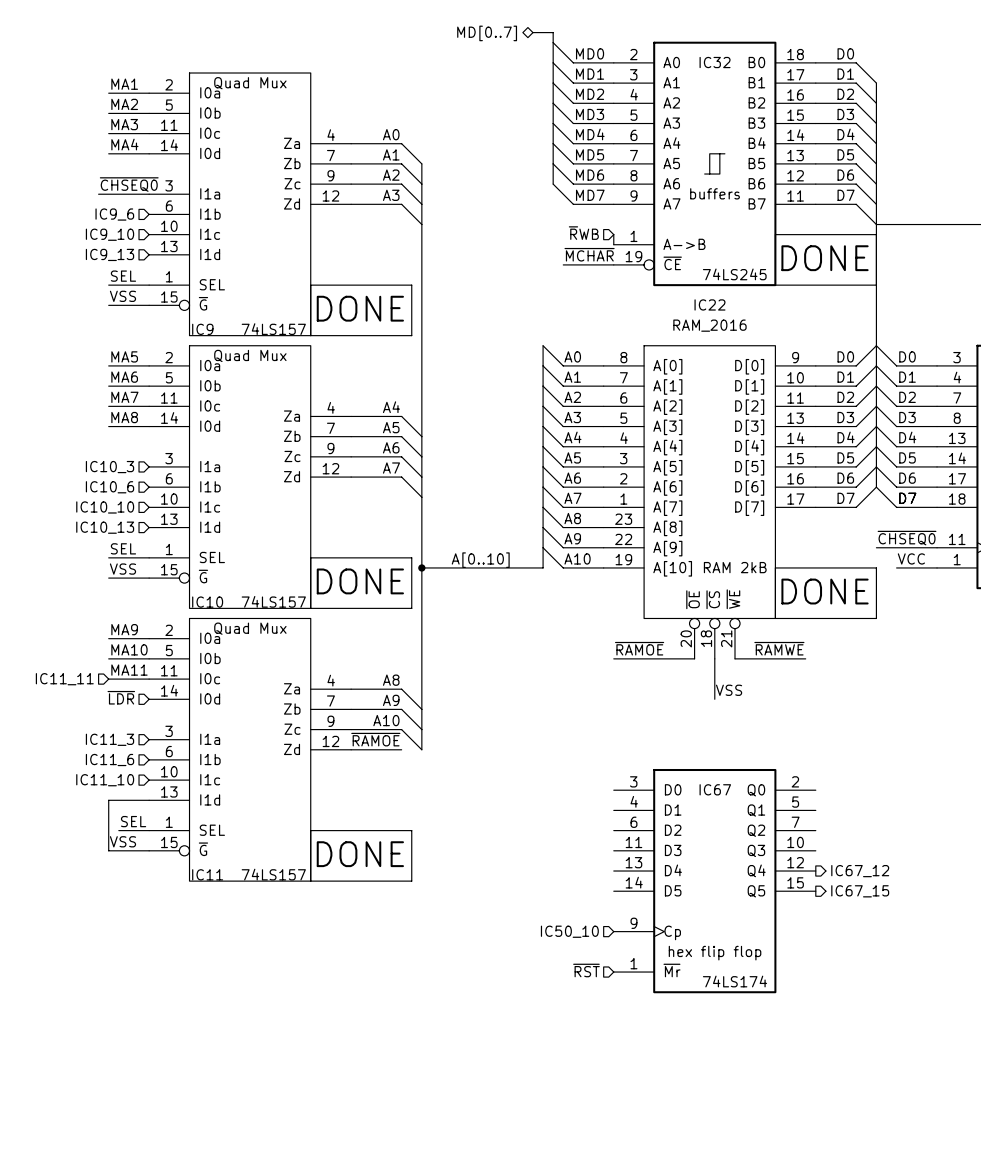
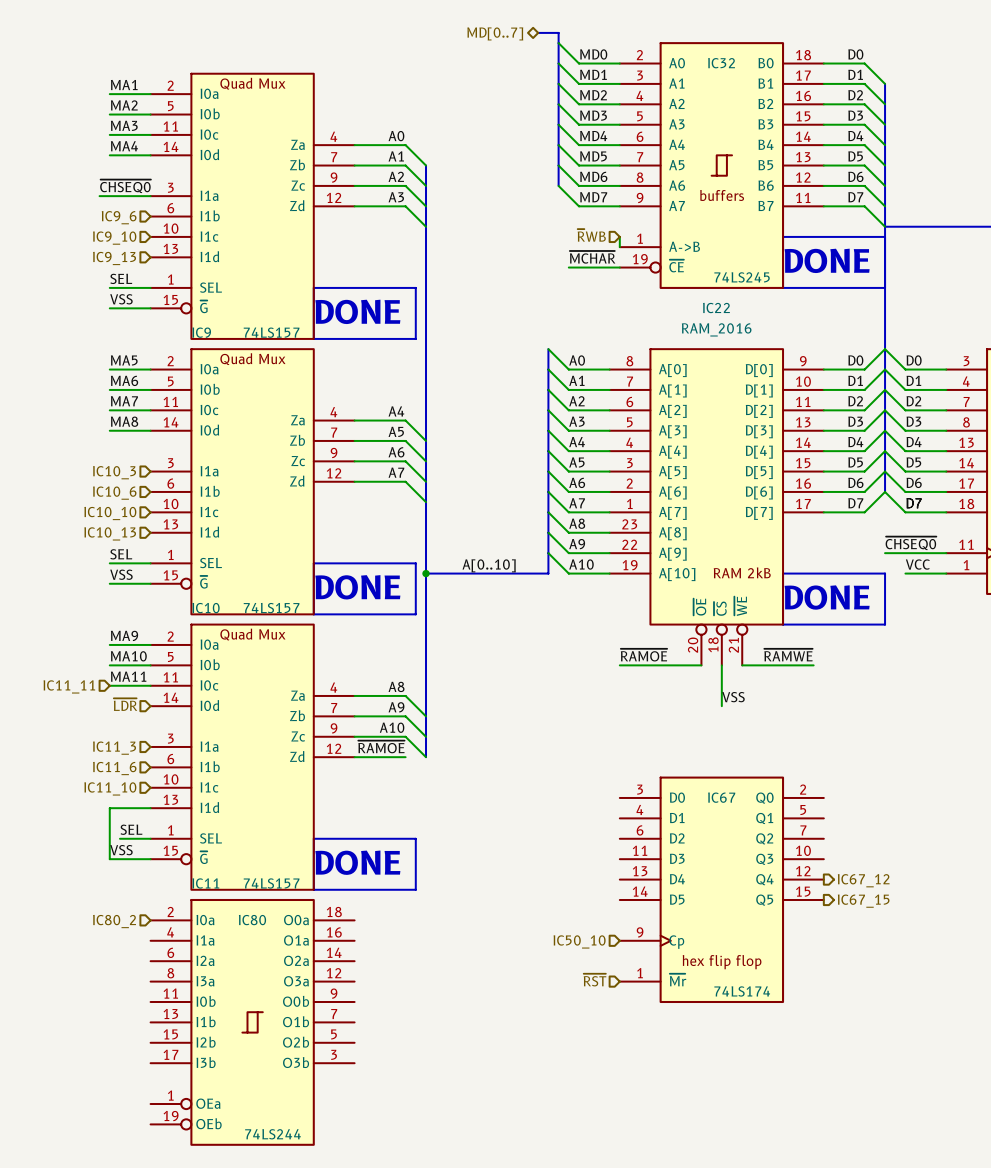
hierarchical label: none -> IC80_2 (114, 921)
IC80: none -> 74LS244 (252, 1022)

